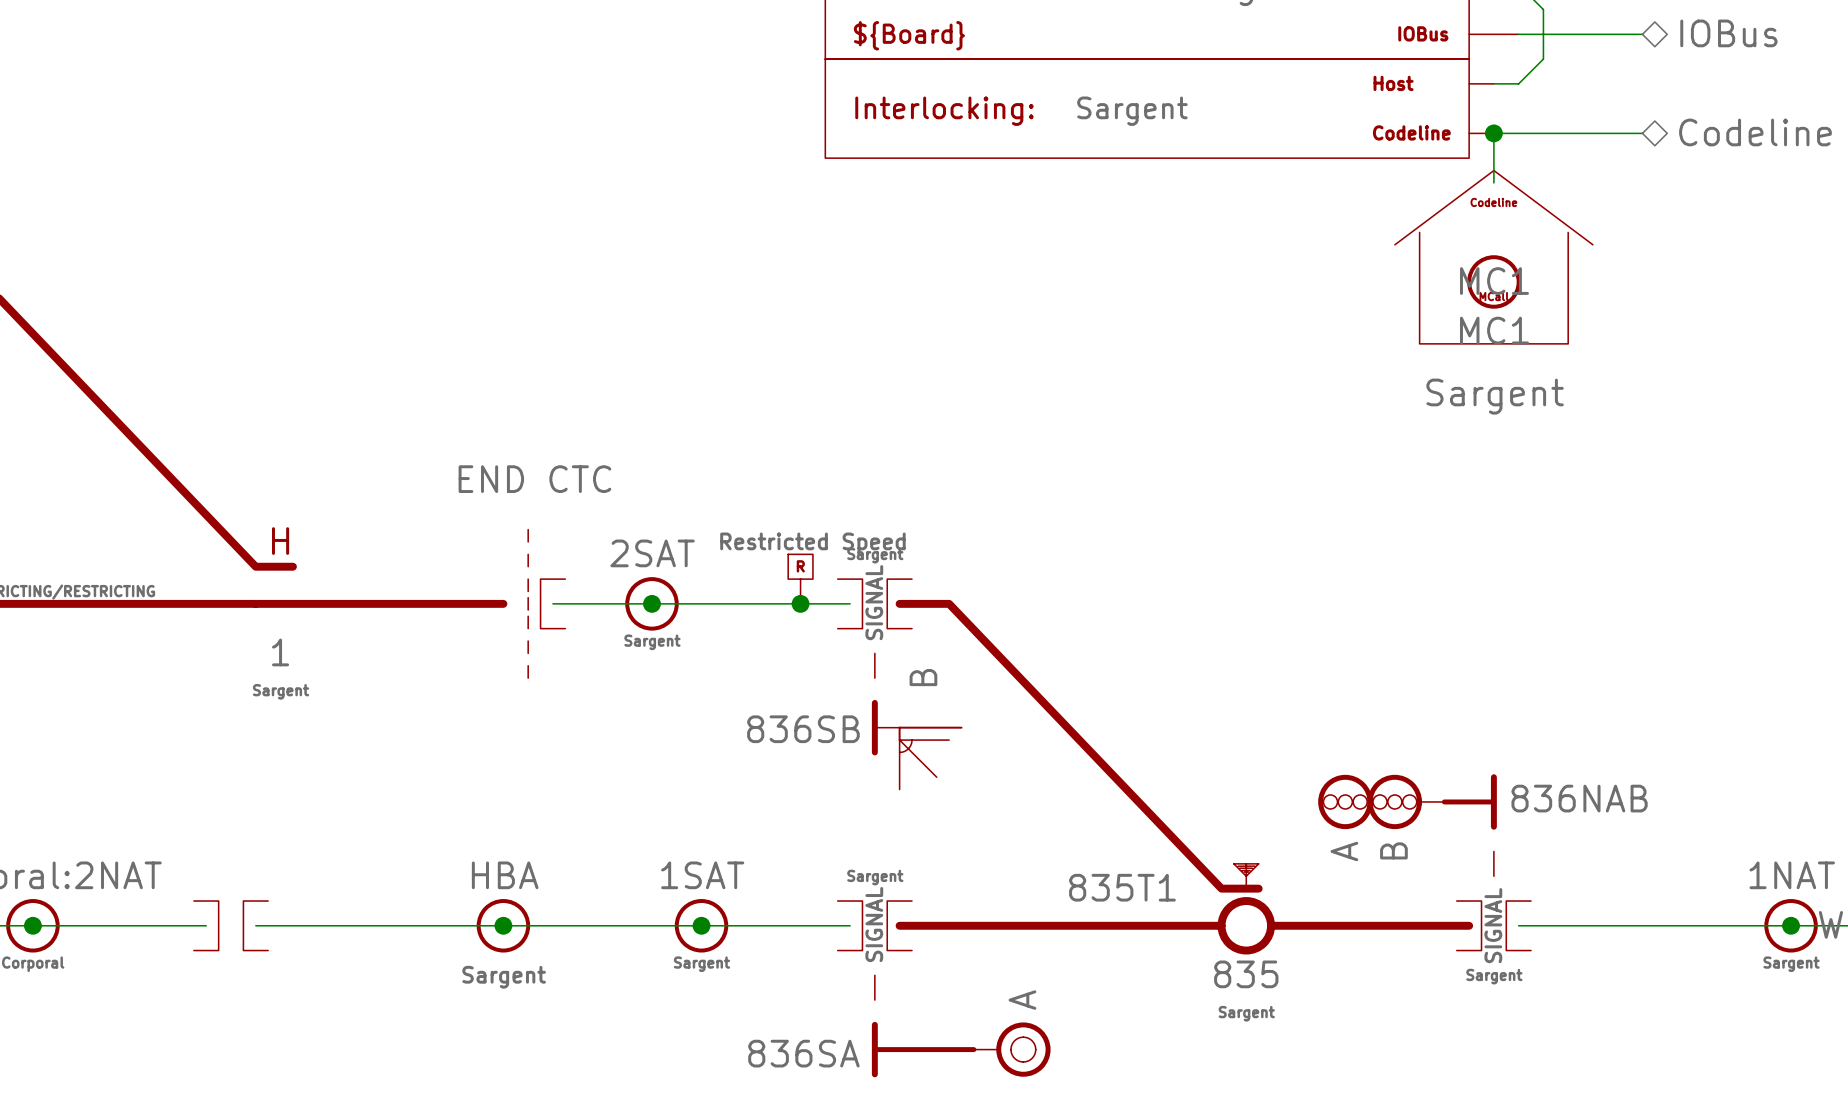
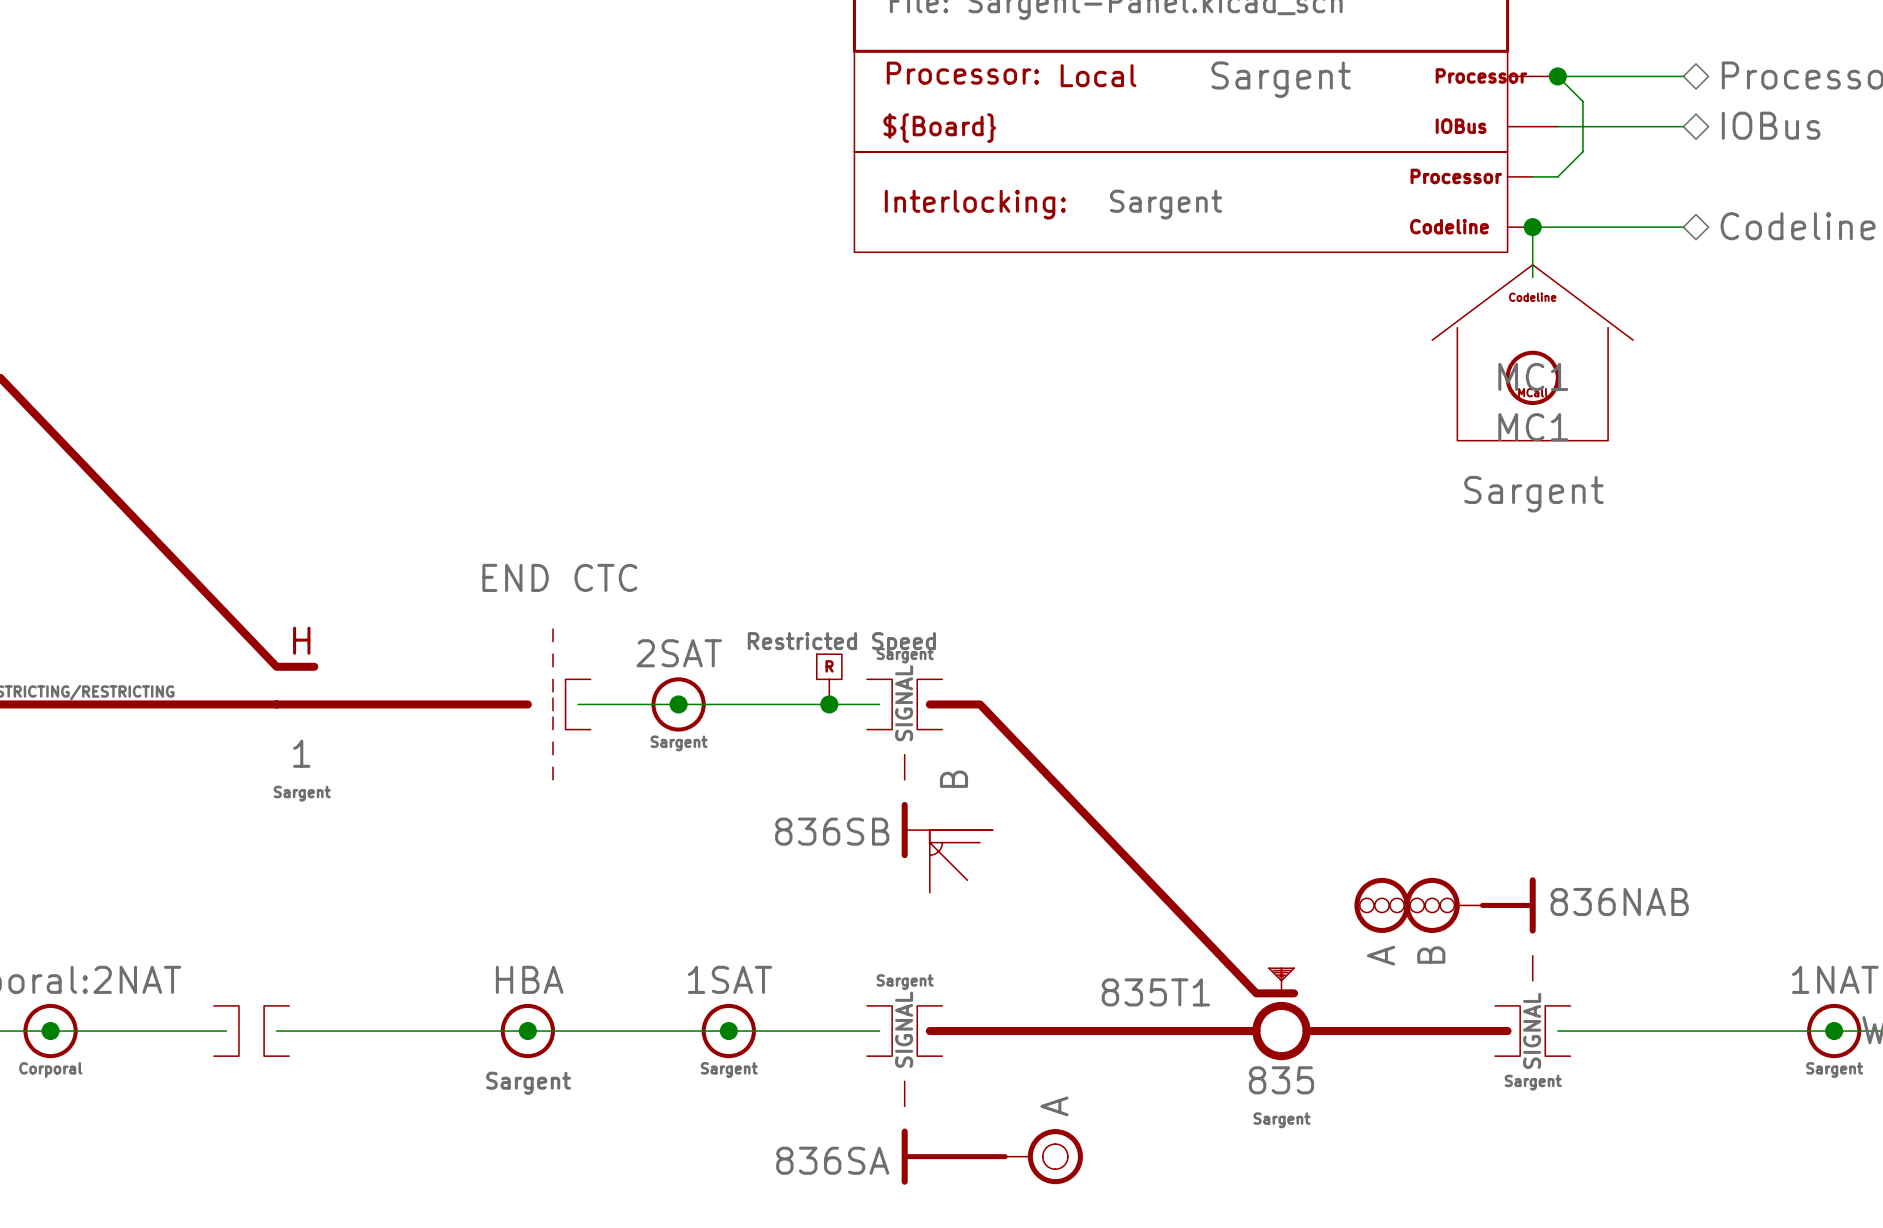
part text: Host (1393, 83) -> Processor (1456, 176)

